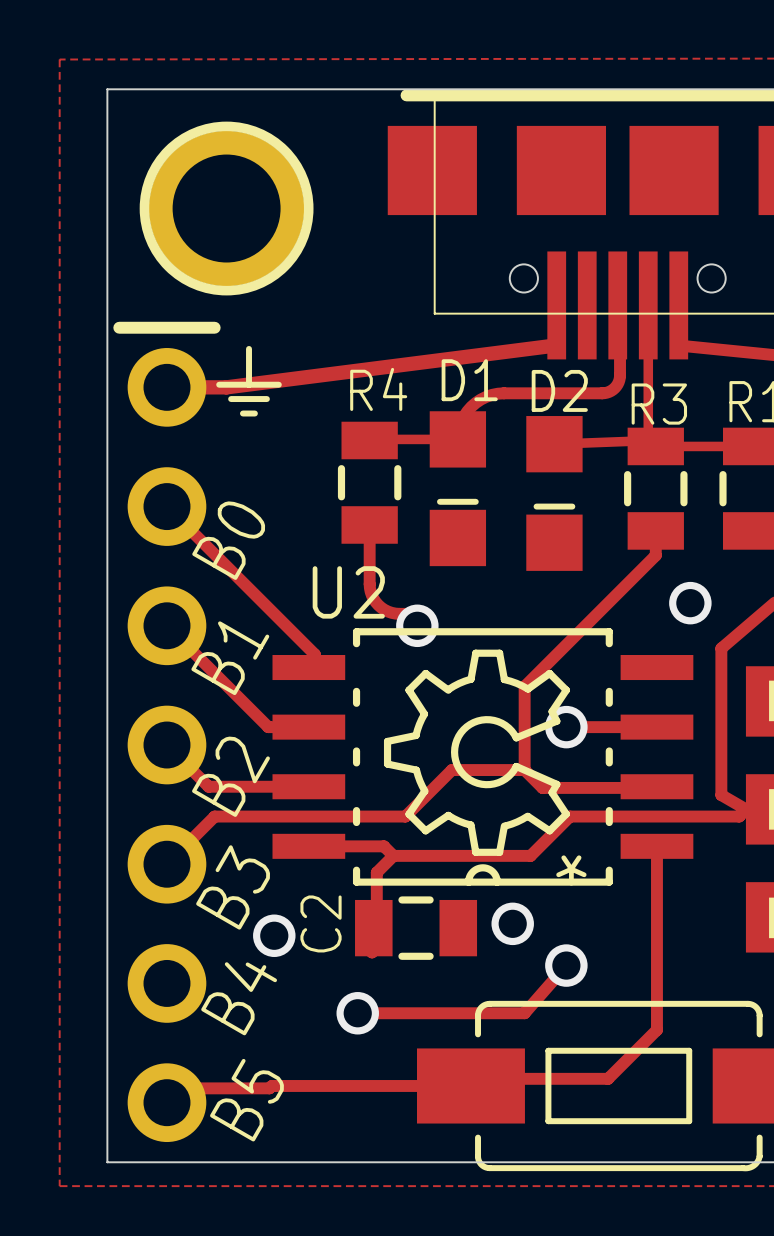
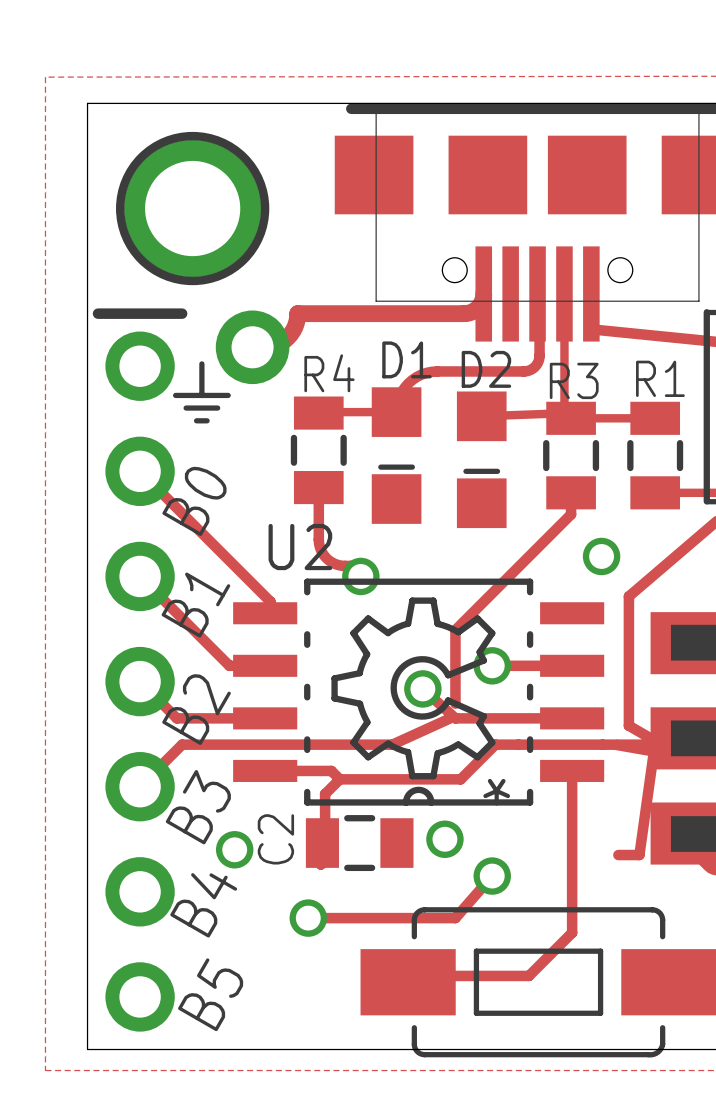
track: (556, 305) (554, 305) (554, 345) (226, 387) (166, 387) -> (483, 293) (479, 305) (466, 313) (297, 313) (293, 330) (284, 340) (272, 346) (252, 347)
line: (249, 348) (249, 384) -> (201, 363) (201, 395)
part: none -> (252, 347)
line: (219, 384) (278, 384) -> (175, 395) (228, 395)
R4 name position: R4 (378, 389) -> R4 (329, 373)
line: (231, 399) (266, 399) -> (186, 408) (217, 408)
line: (242, 413) (254, 413) -> (196, 420) (207, 420)
via: none -> (422, 688)
track: (656, 786) (542, 787) (524, 770) (451, 770) (405, 816) -> (422, 688) (455, 718) (572, 718) (450, 718) (392, 744) (350, 744)
track: none -> (616, 745) (653, 751) (639, 855) (618, 855)
track: (470, 1085) (271, 1085) (269, 1088) (181, 1088) (166, 1102) -> none

